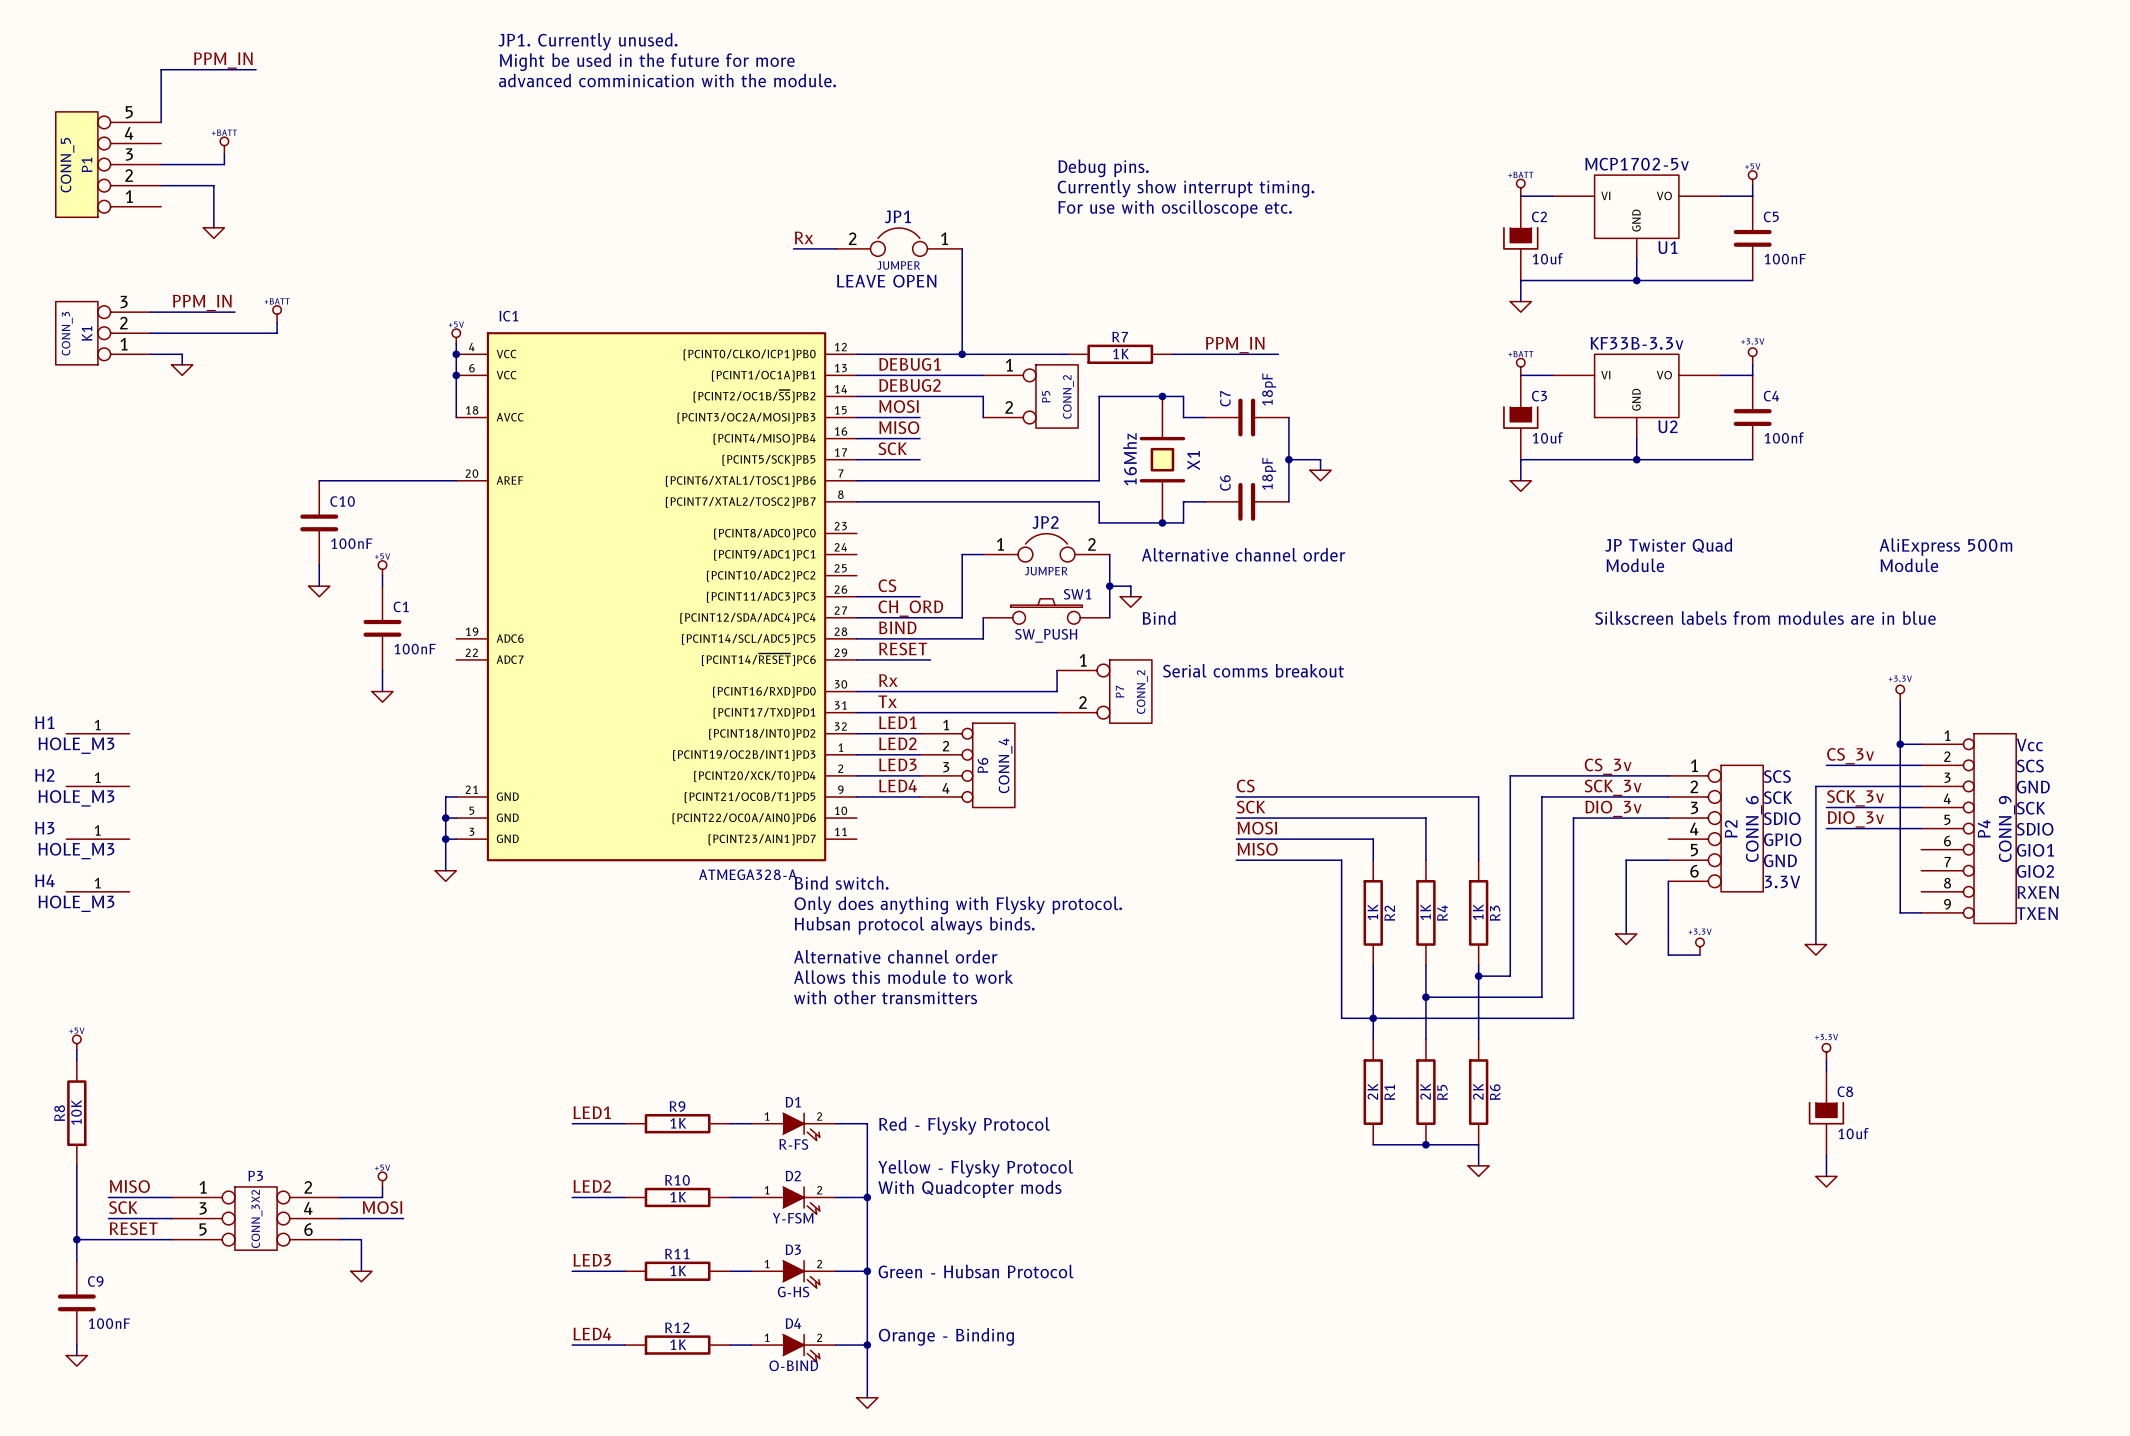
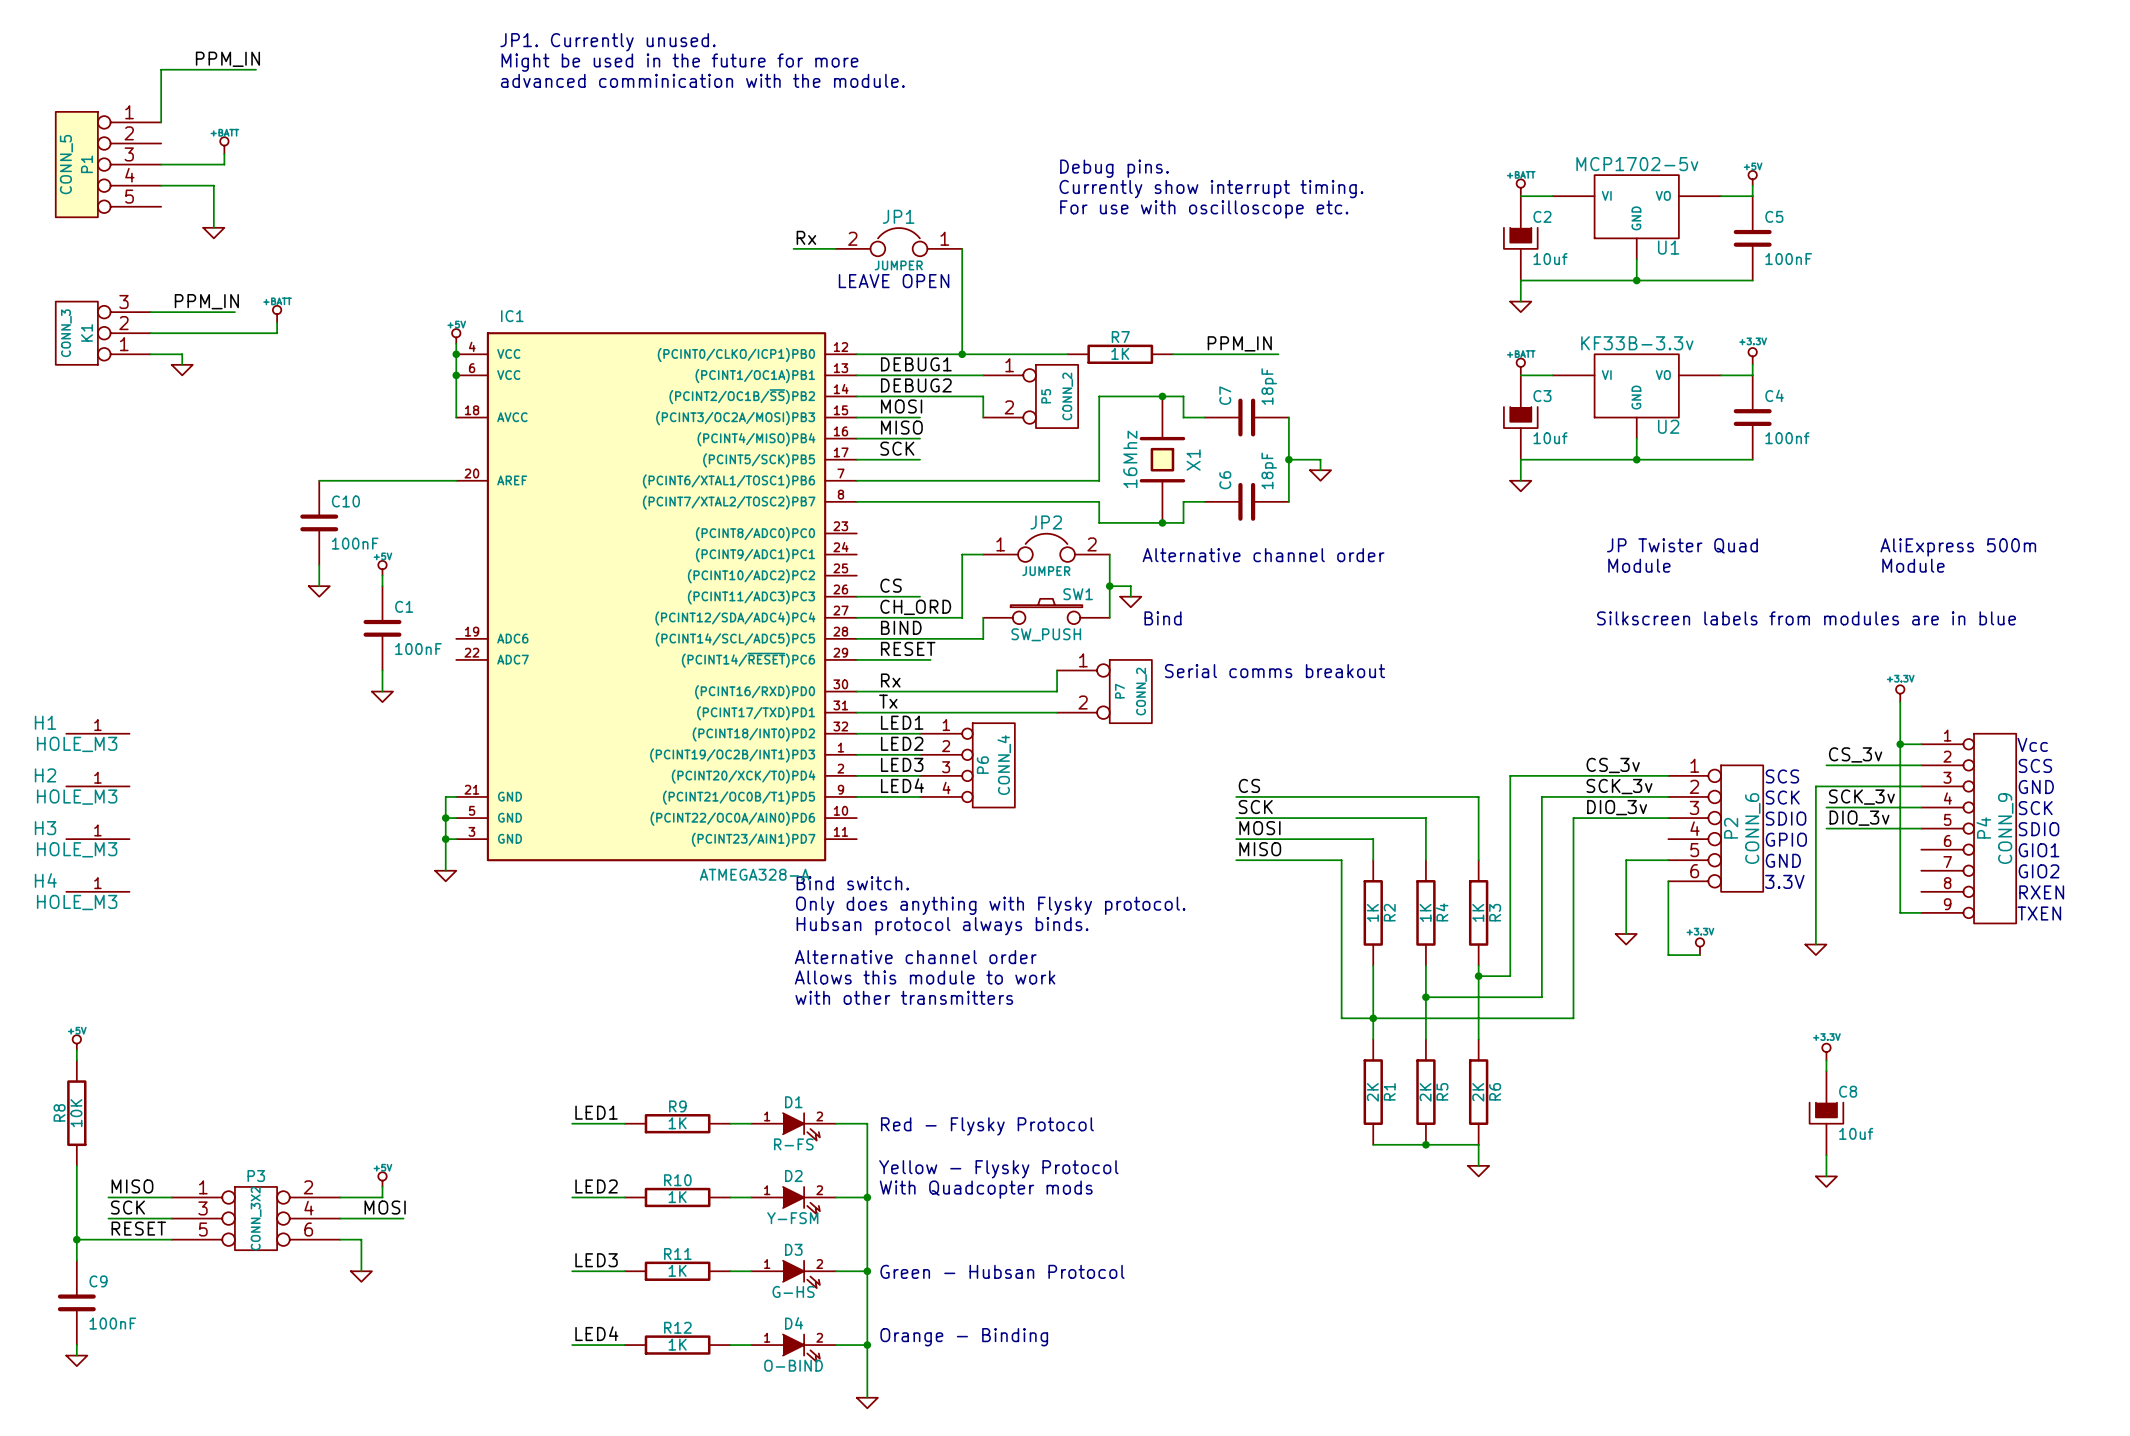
P1 flip: as is (76, 164) -> up-down (76, 164)

